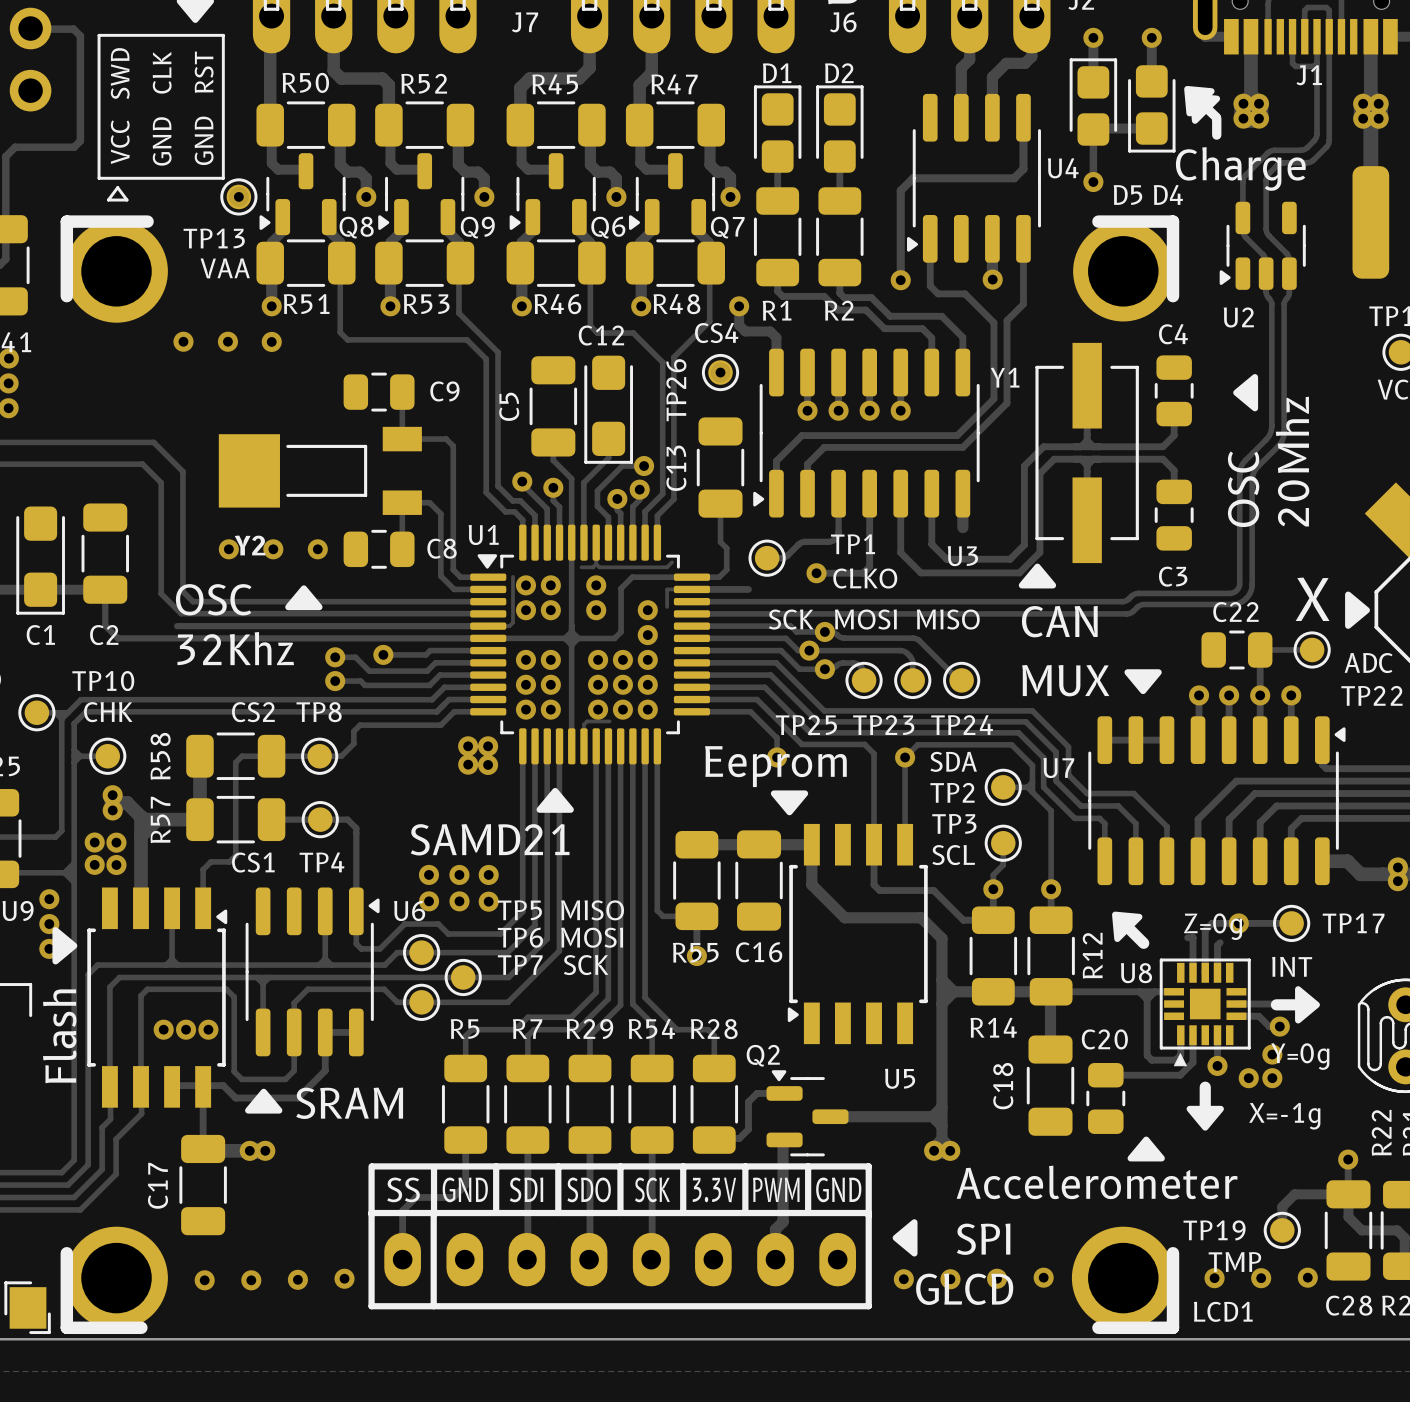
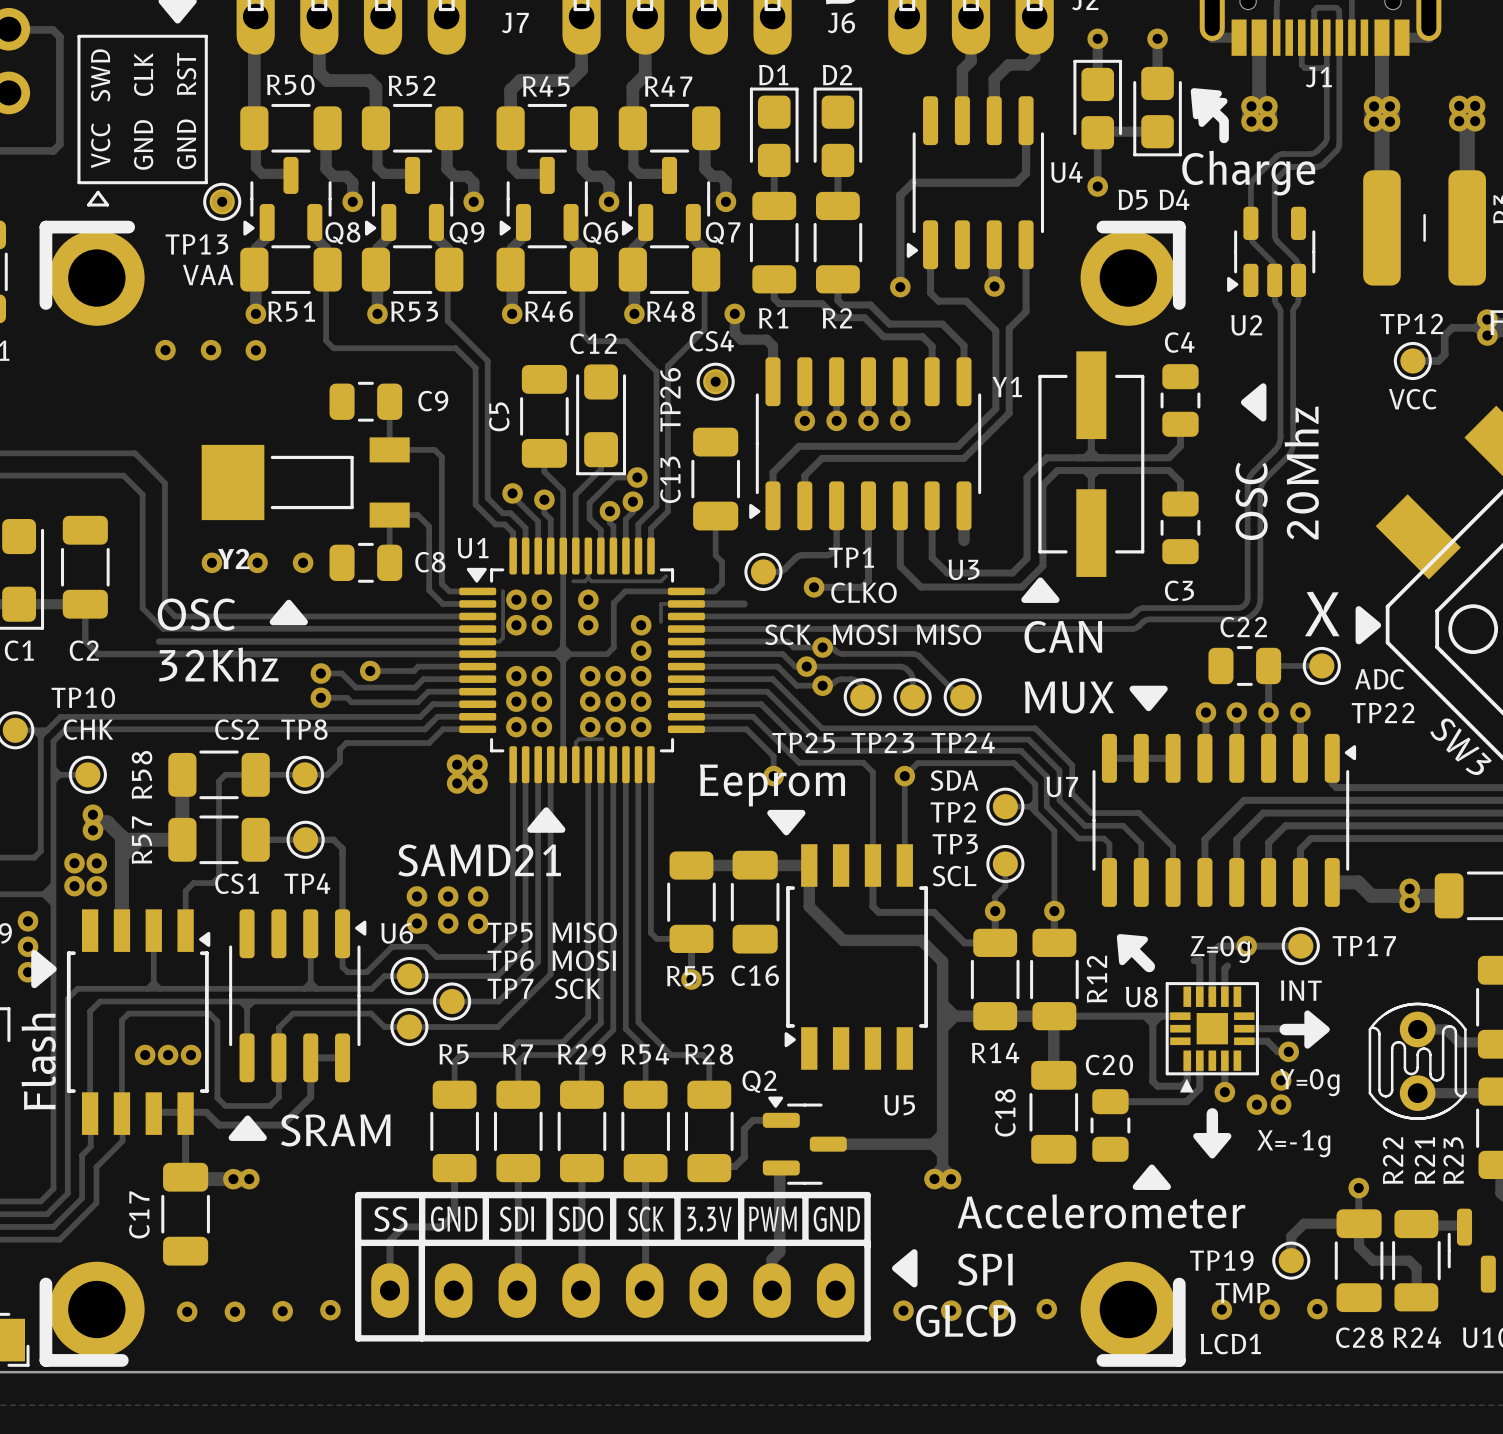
LCD1 footprint: [60, 215, 1180, 1335] -> [39, 220, 1186, 1367]

